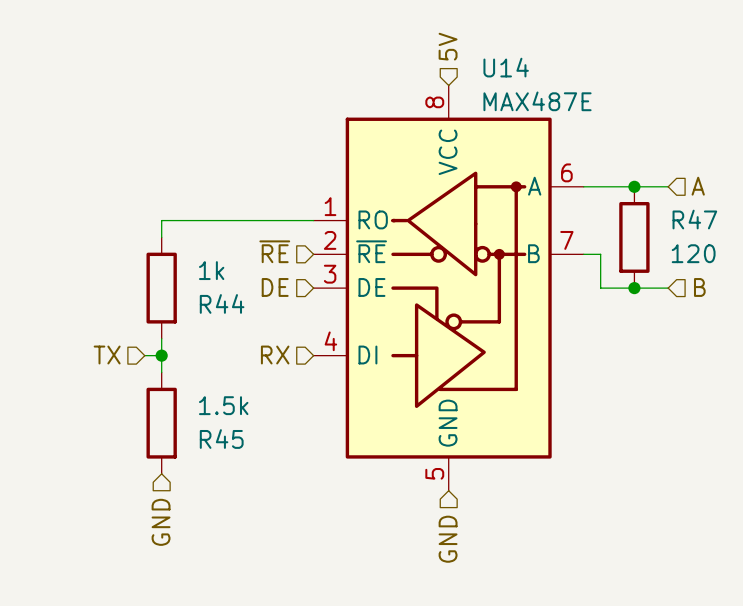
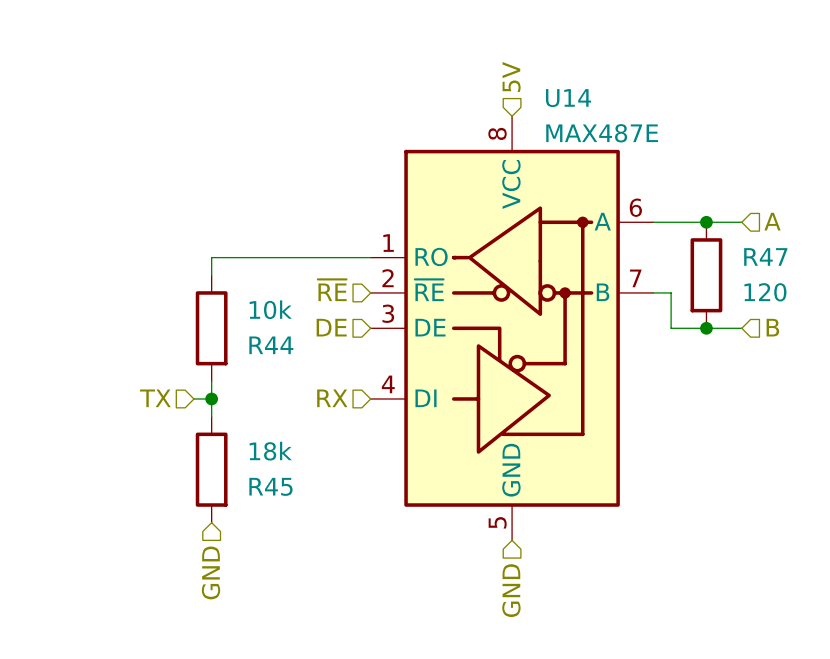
R44 value: 1k (211, 270) -> 10k (270, 309)
R45 value: 1.5k (223, 405) -> 18k (270, 451)

